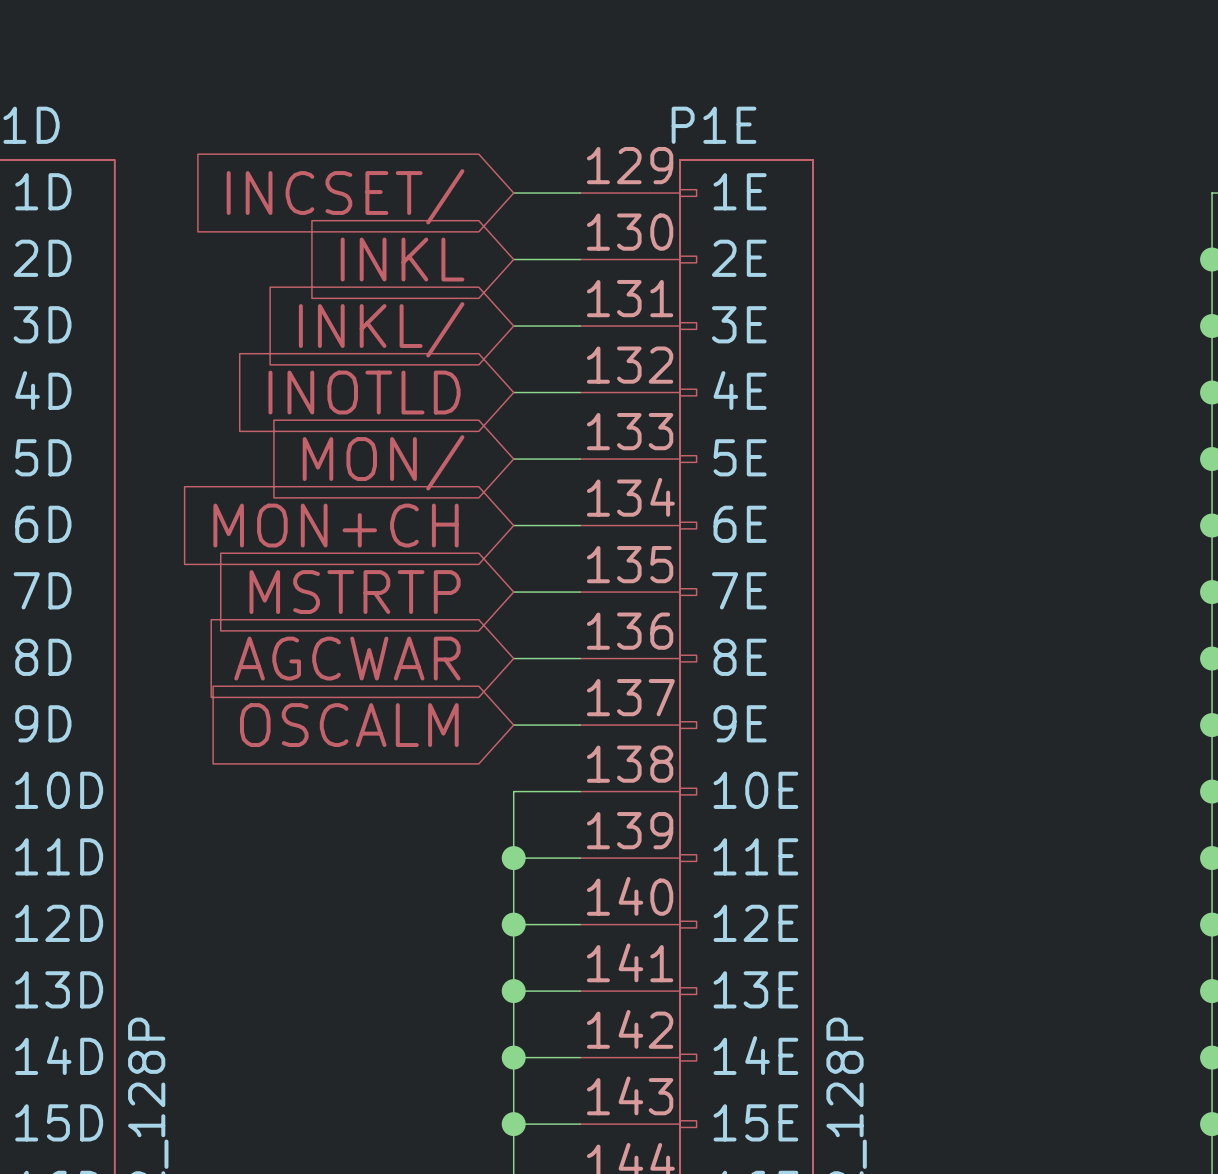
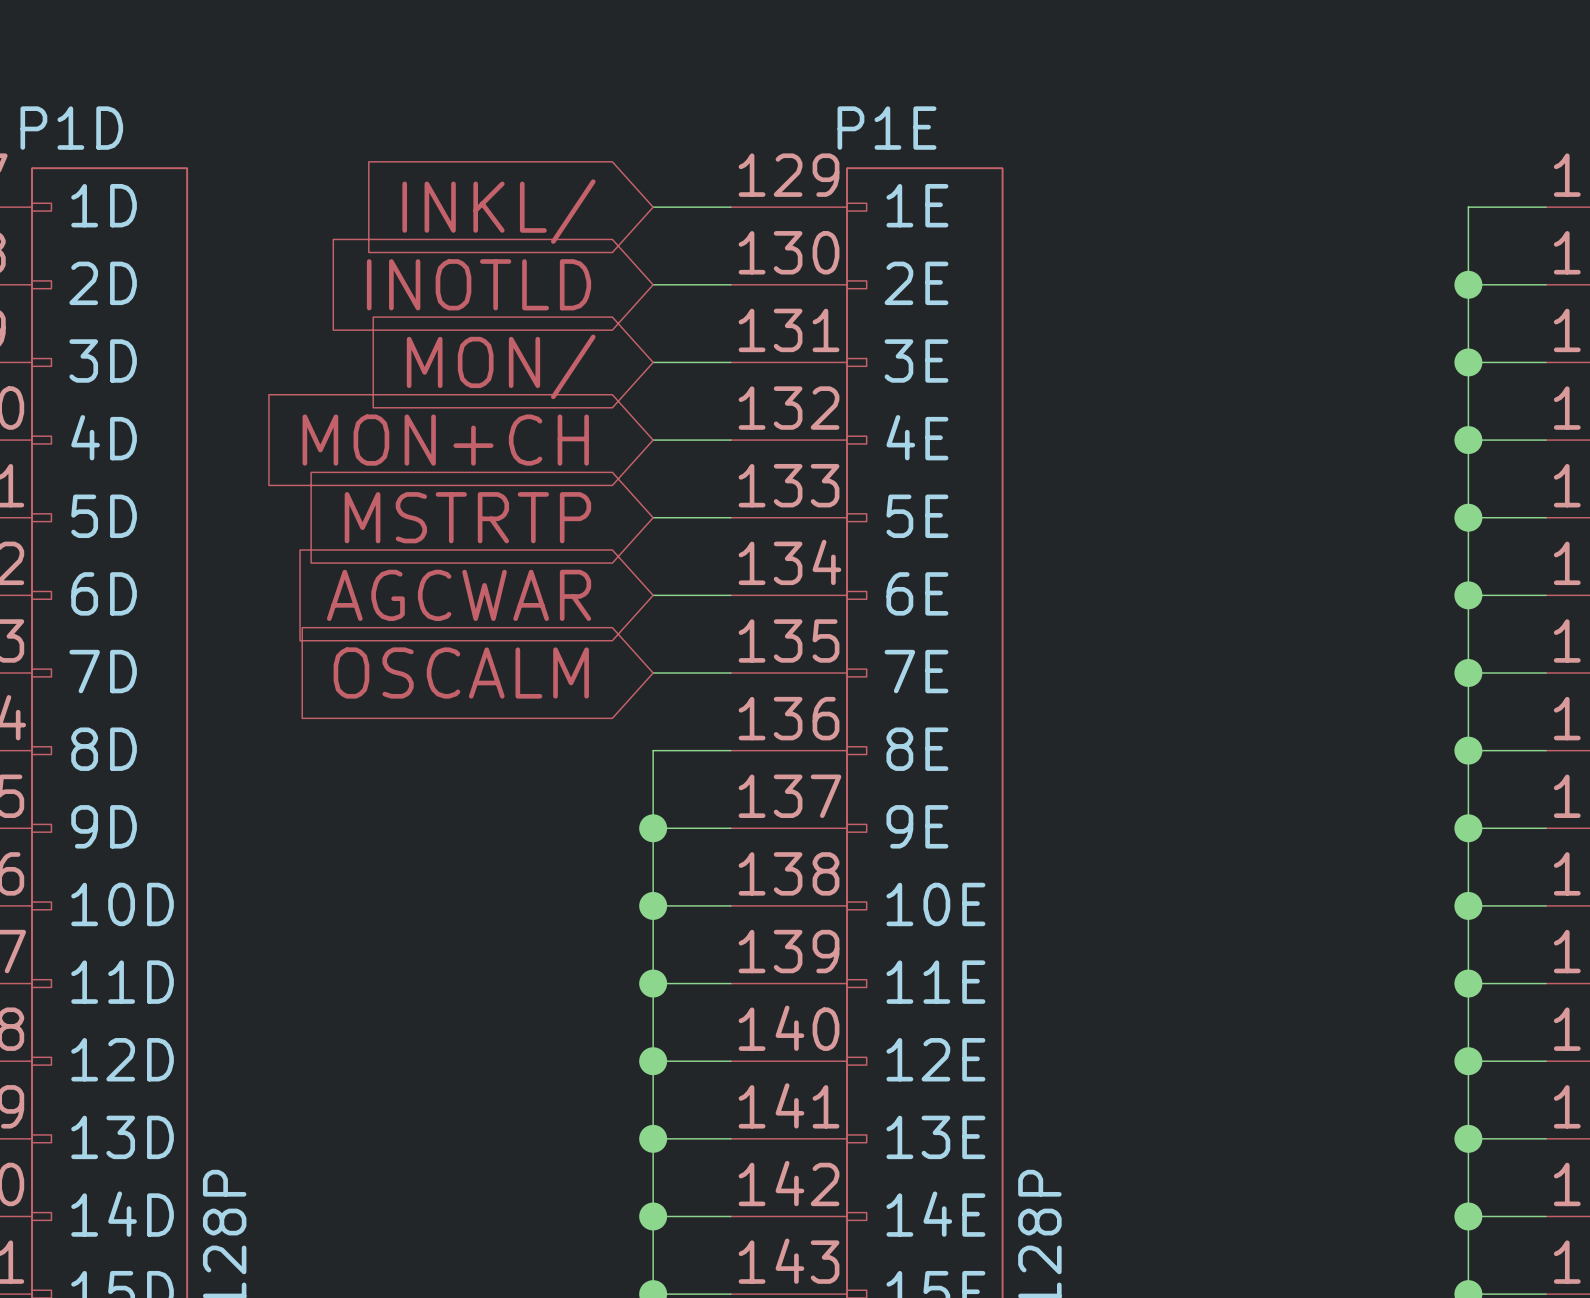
global label: INCSET/ (345, 196) -> INKL/ (498, 211)
global label: INKL (402, 259) -> INOTLD (479, 284)
global label: INKL/ (381, 329) -> MON/ (501, 366)
global label: INOTLD (364, 392) -> MON+CH (445, 440)
global label: MON/ (383, 462) -> MSTRTP (467, 517)
global label: MON+CH (336, 525) -> AGCWAR (459, 595)
global label: MSTRTP (355, 592) -> OSCALM (461, 673)
global label: AGCWAR (347, 658) -> none
wire: none -> (653, 750) (653, 905)
global label: OSCALM (349, 725) -> none
junction: none -> (653, 828)
junction: none -> (653, 905)

